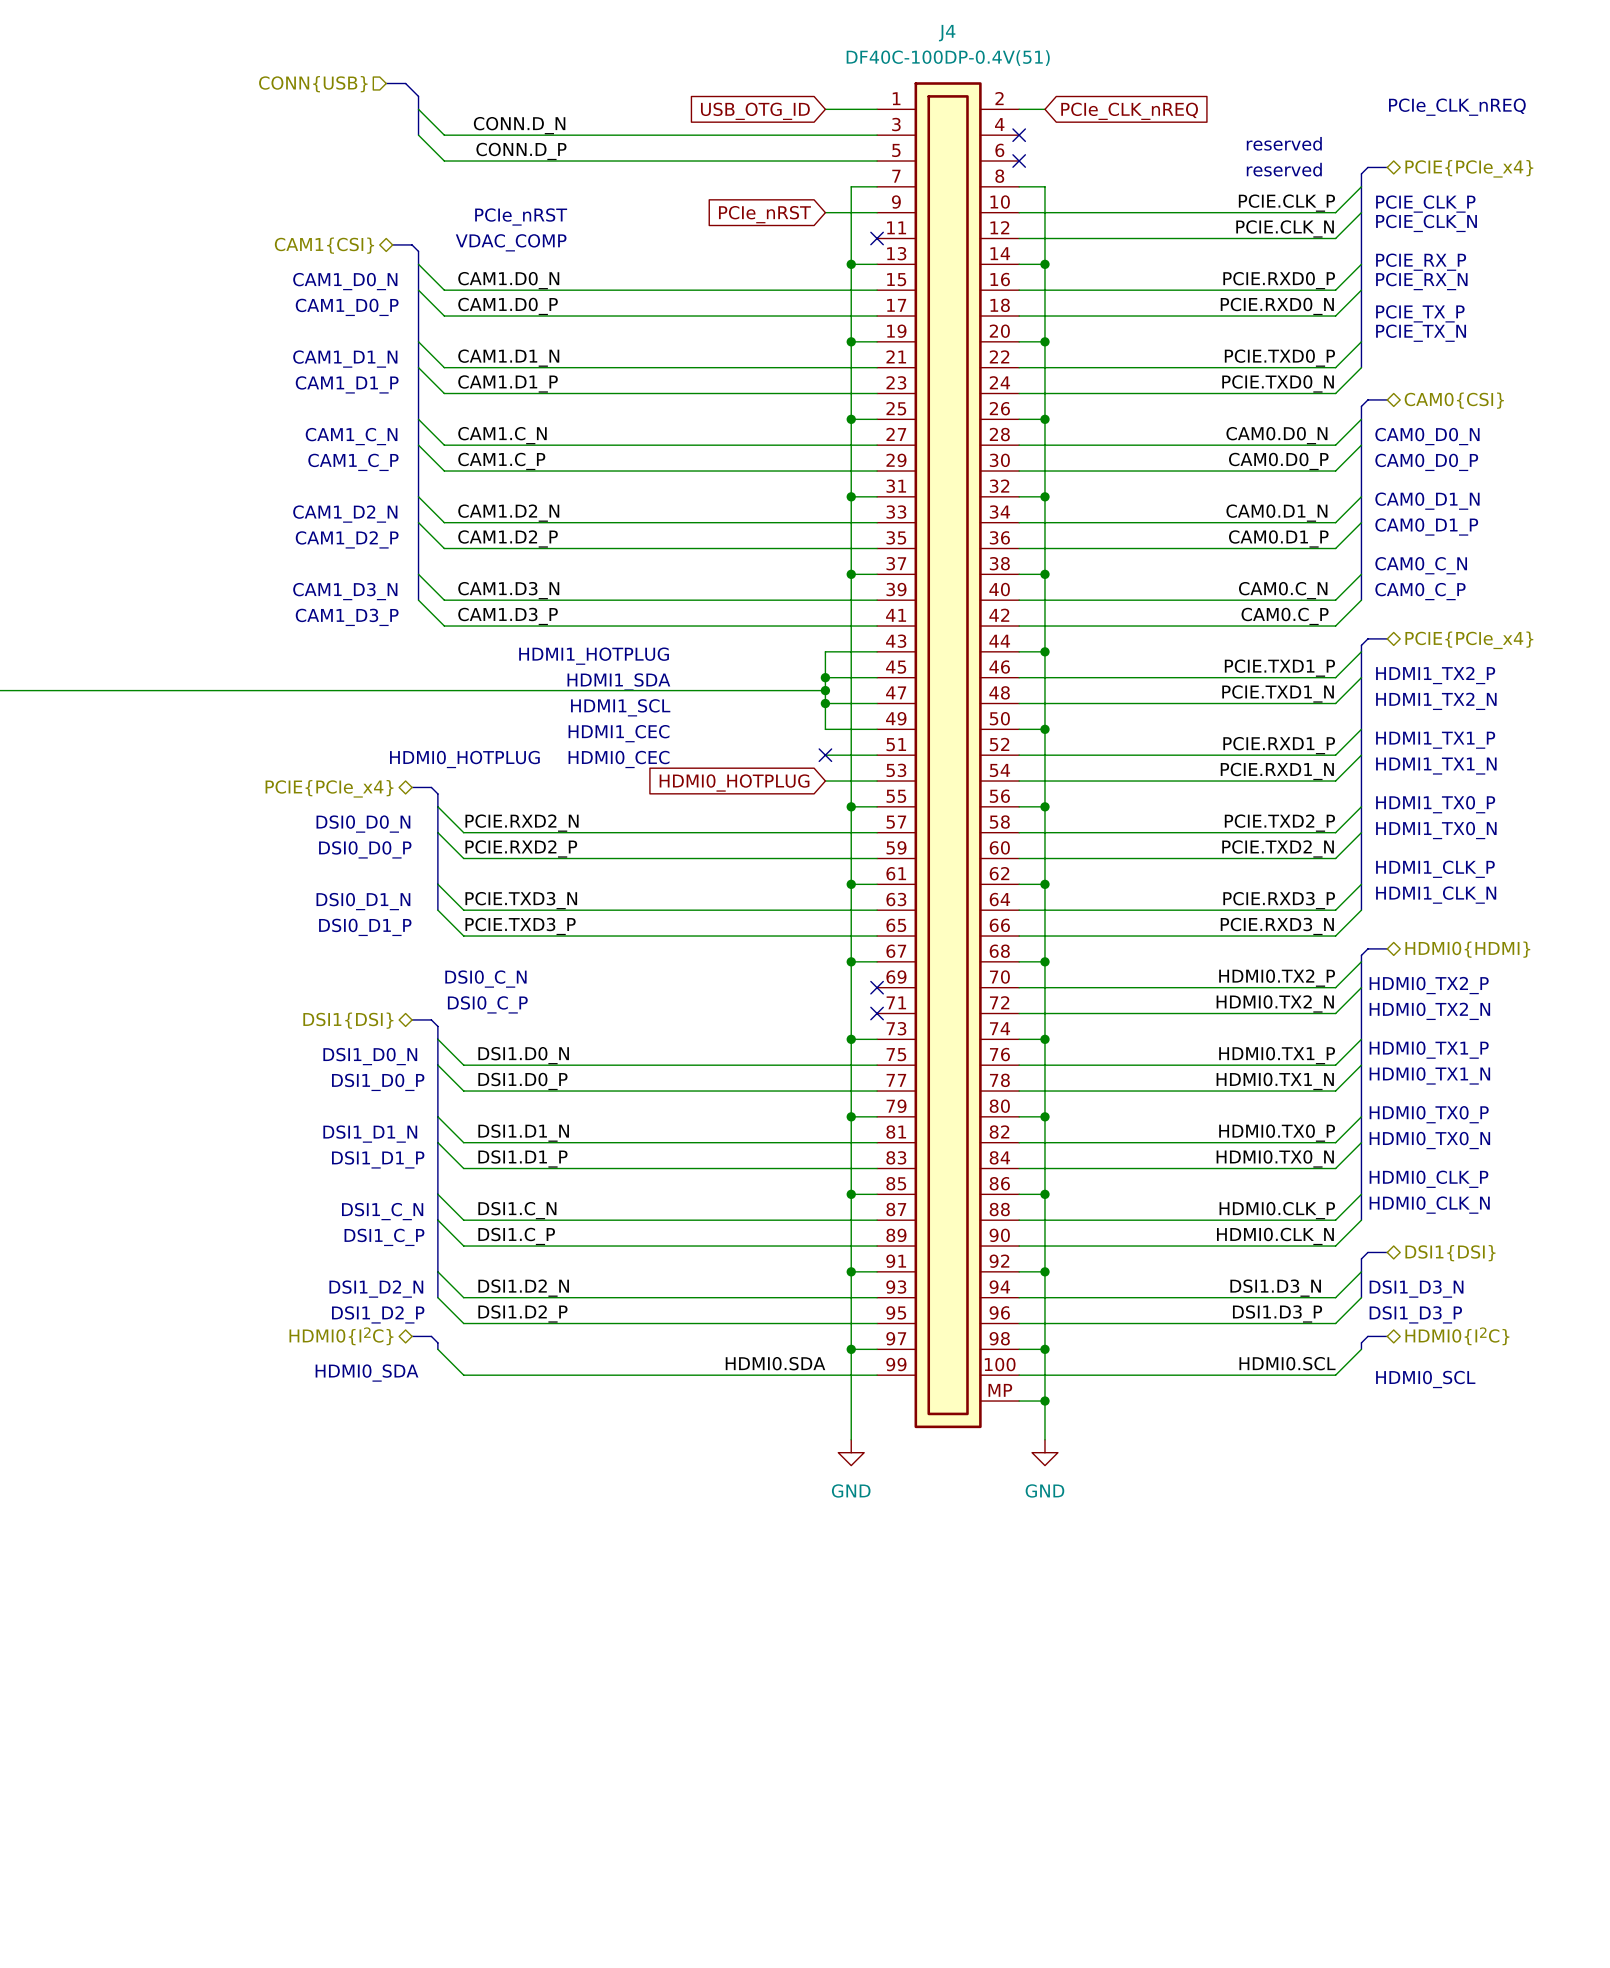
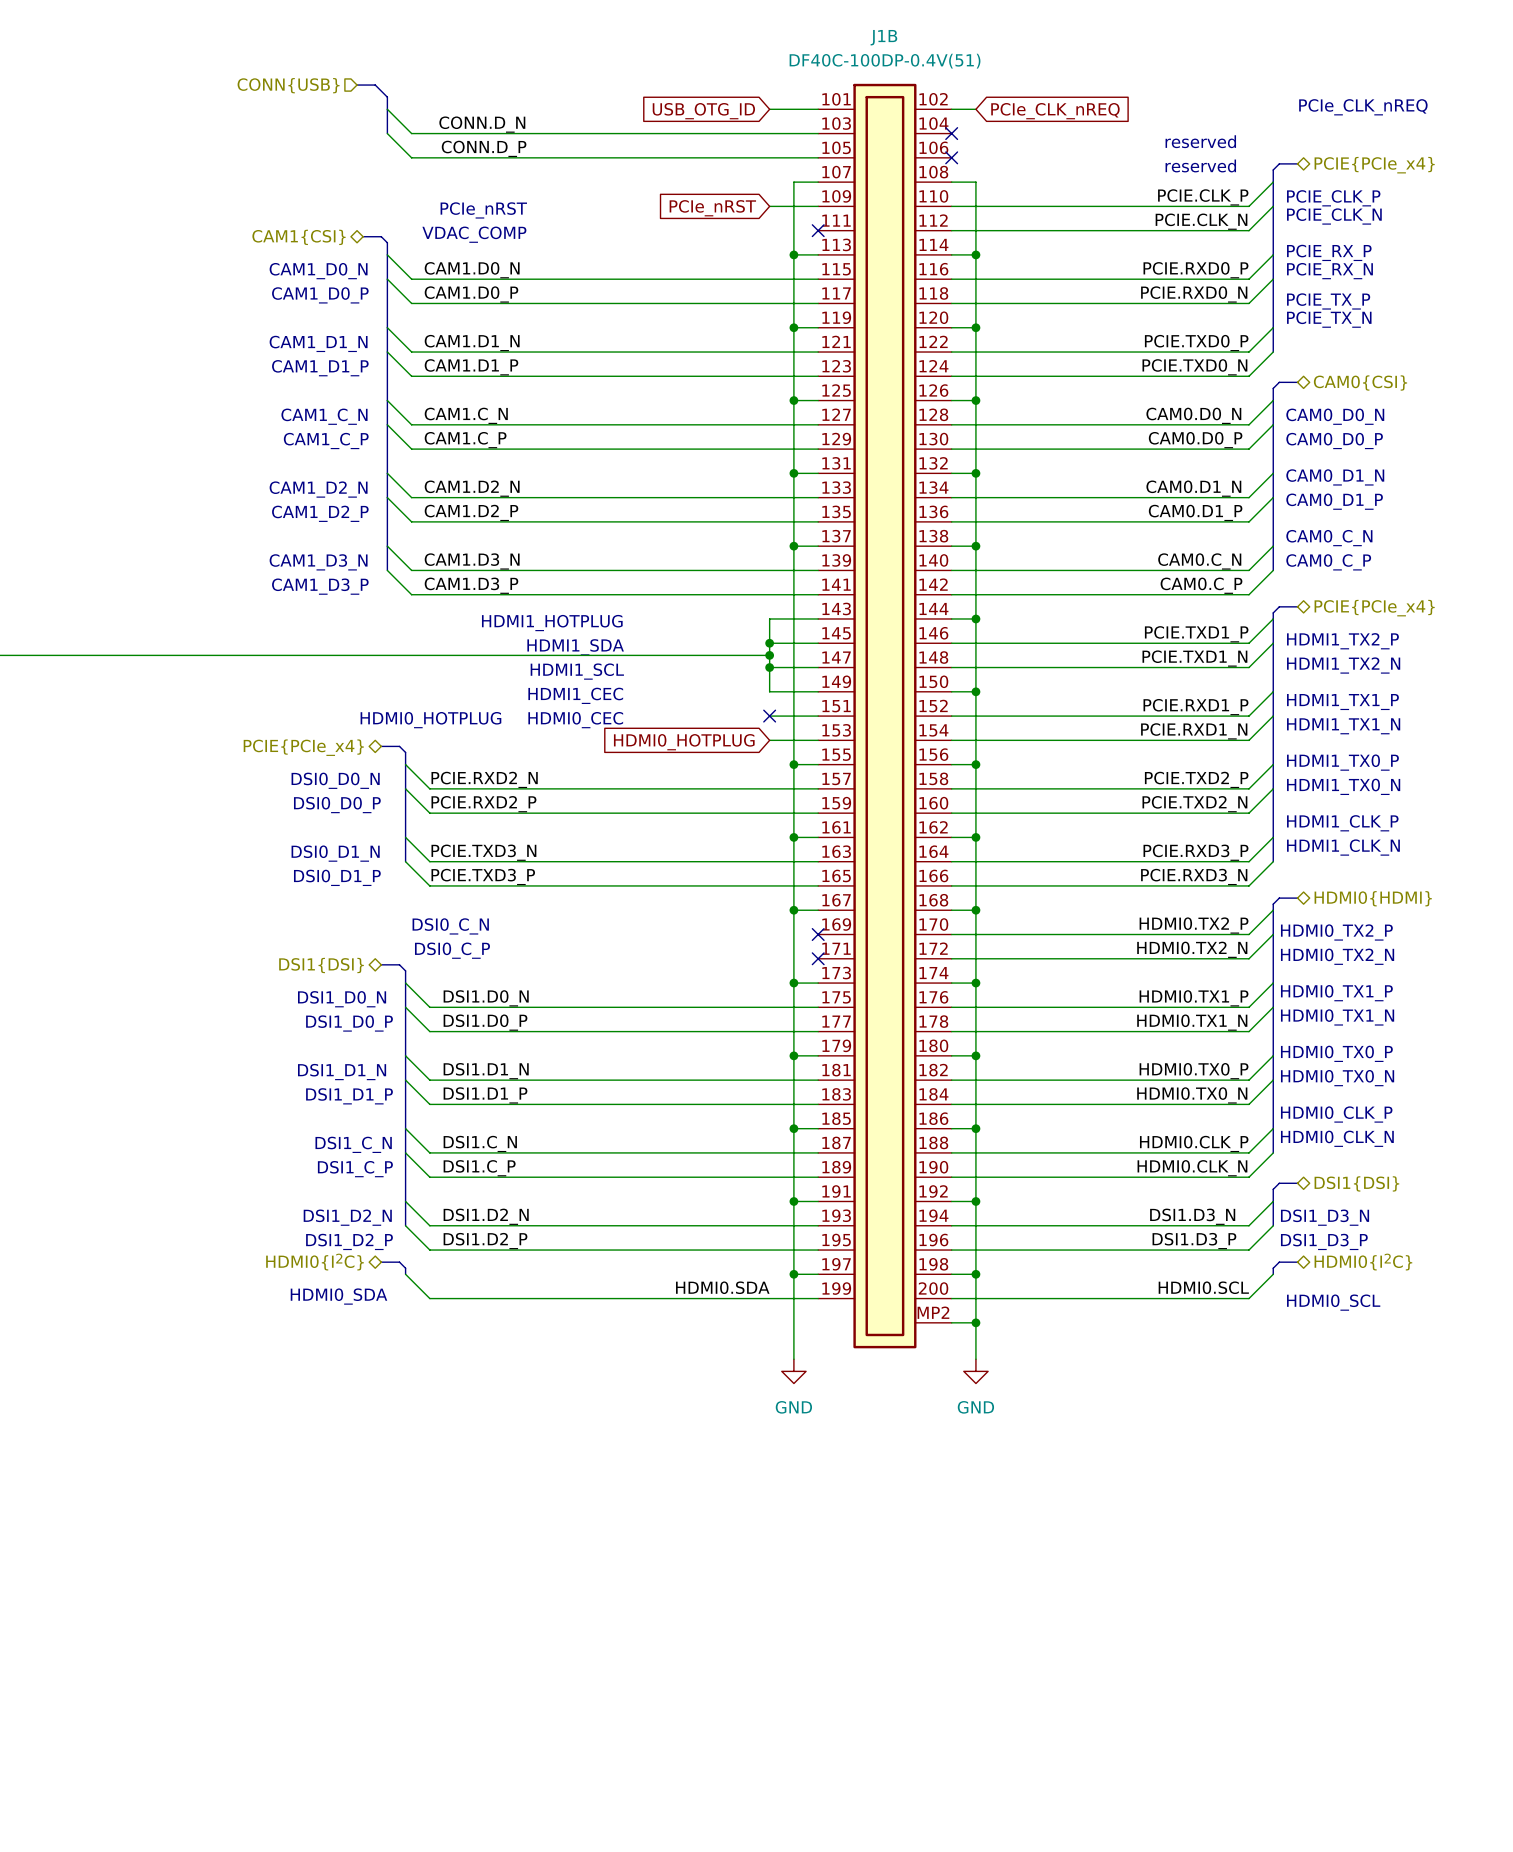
J4 name: J4 (947, 33) -> J1B (883, 37)
J4 symbol: [877, 82, 1020, 1429] -> [818, 83, 952, 1349]

